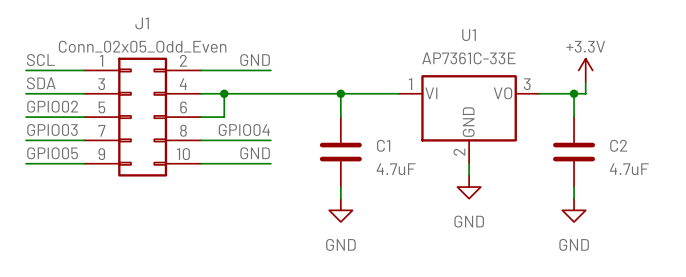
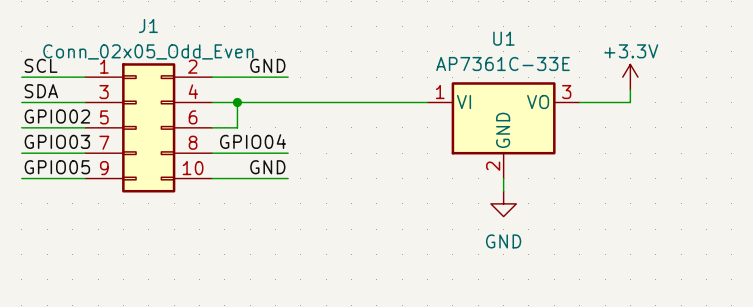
wire: (340, 93) (340, 117) -> none
junction: (340, 93) -> none
wire: (574, 93) (574, 117) -> none
junction: (574, 93) -> none
C1: 4.7uF (340, 152) -> none
C2: 4.7uF (574, 152) -> none
wire: (340, 187) (340, 198) -> none
wire: (574, 187) (574, 198) -> none
power symbol: GND (340, 210) -> none
power symbol: GND (574, 210) -> none

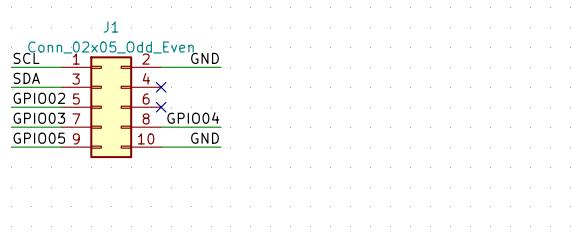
power symbol: +3.3V (630, 77) -> none
wire: (630, 89) (630, 102) (579, 102) -> none
wire: (212, 102) (427, 102) -> none
no-connect mark: none -> (161, 87)
wire: (237, 102) (237, 127) (212, 127) -> none
junction: (237, 102) -> none
no-connect mark: none -> (161, 107)
U1: AP7361C-33E (503, 130) -> none
wire: (503, 178) (503, 191) -> none
power symbol: GND (503, 203) -> none

